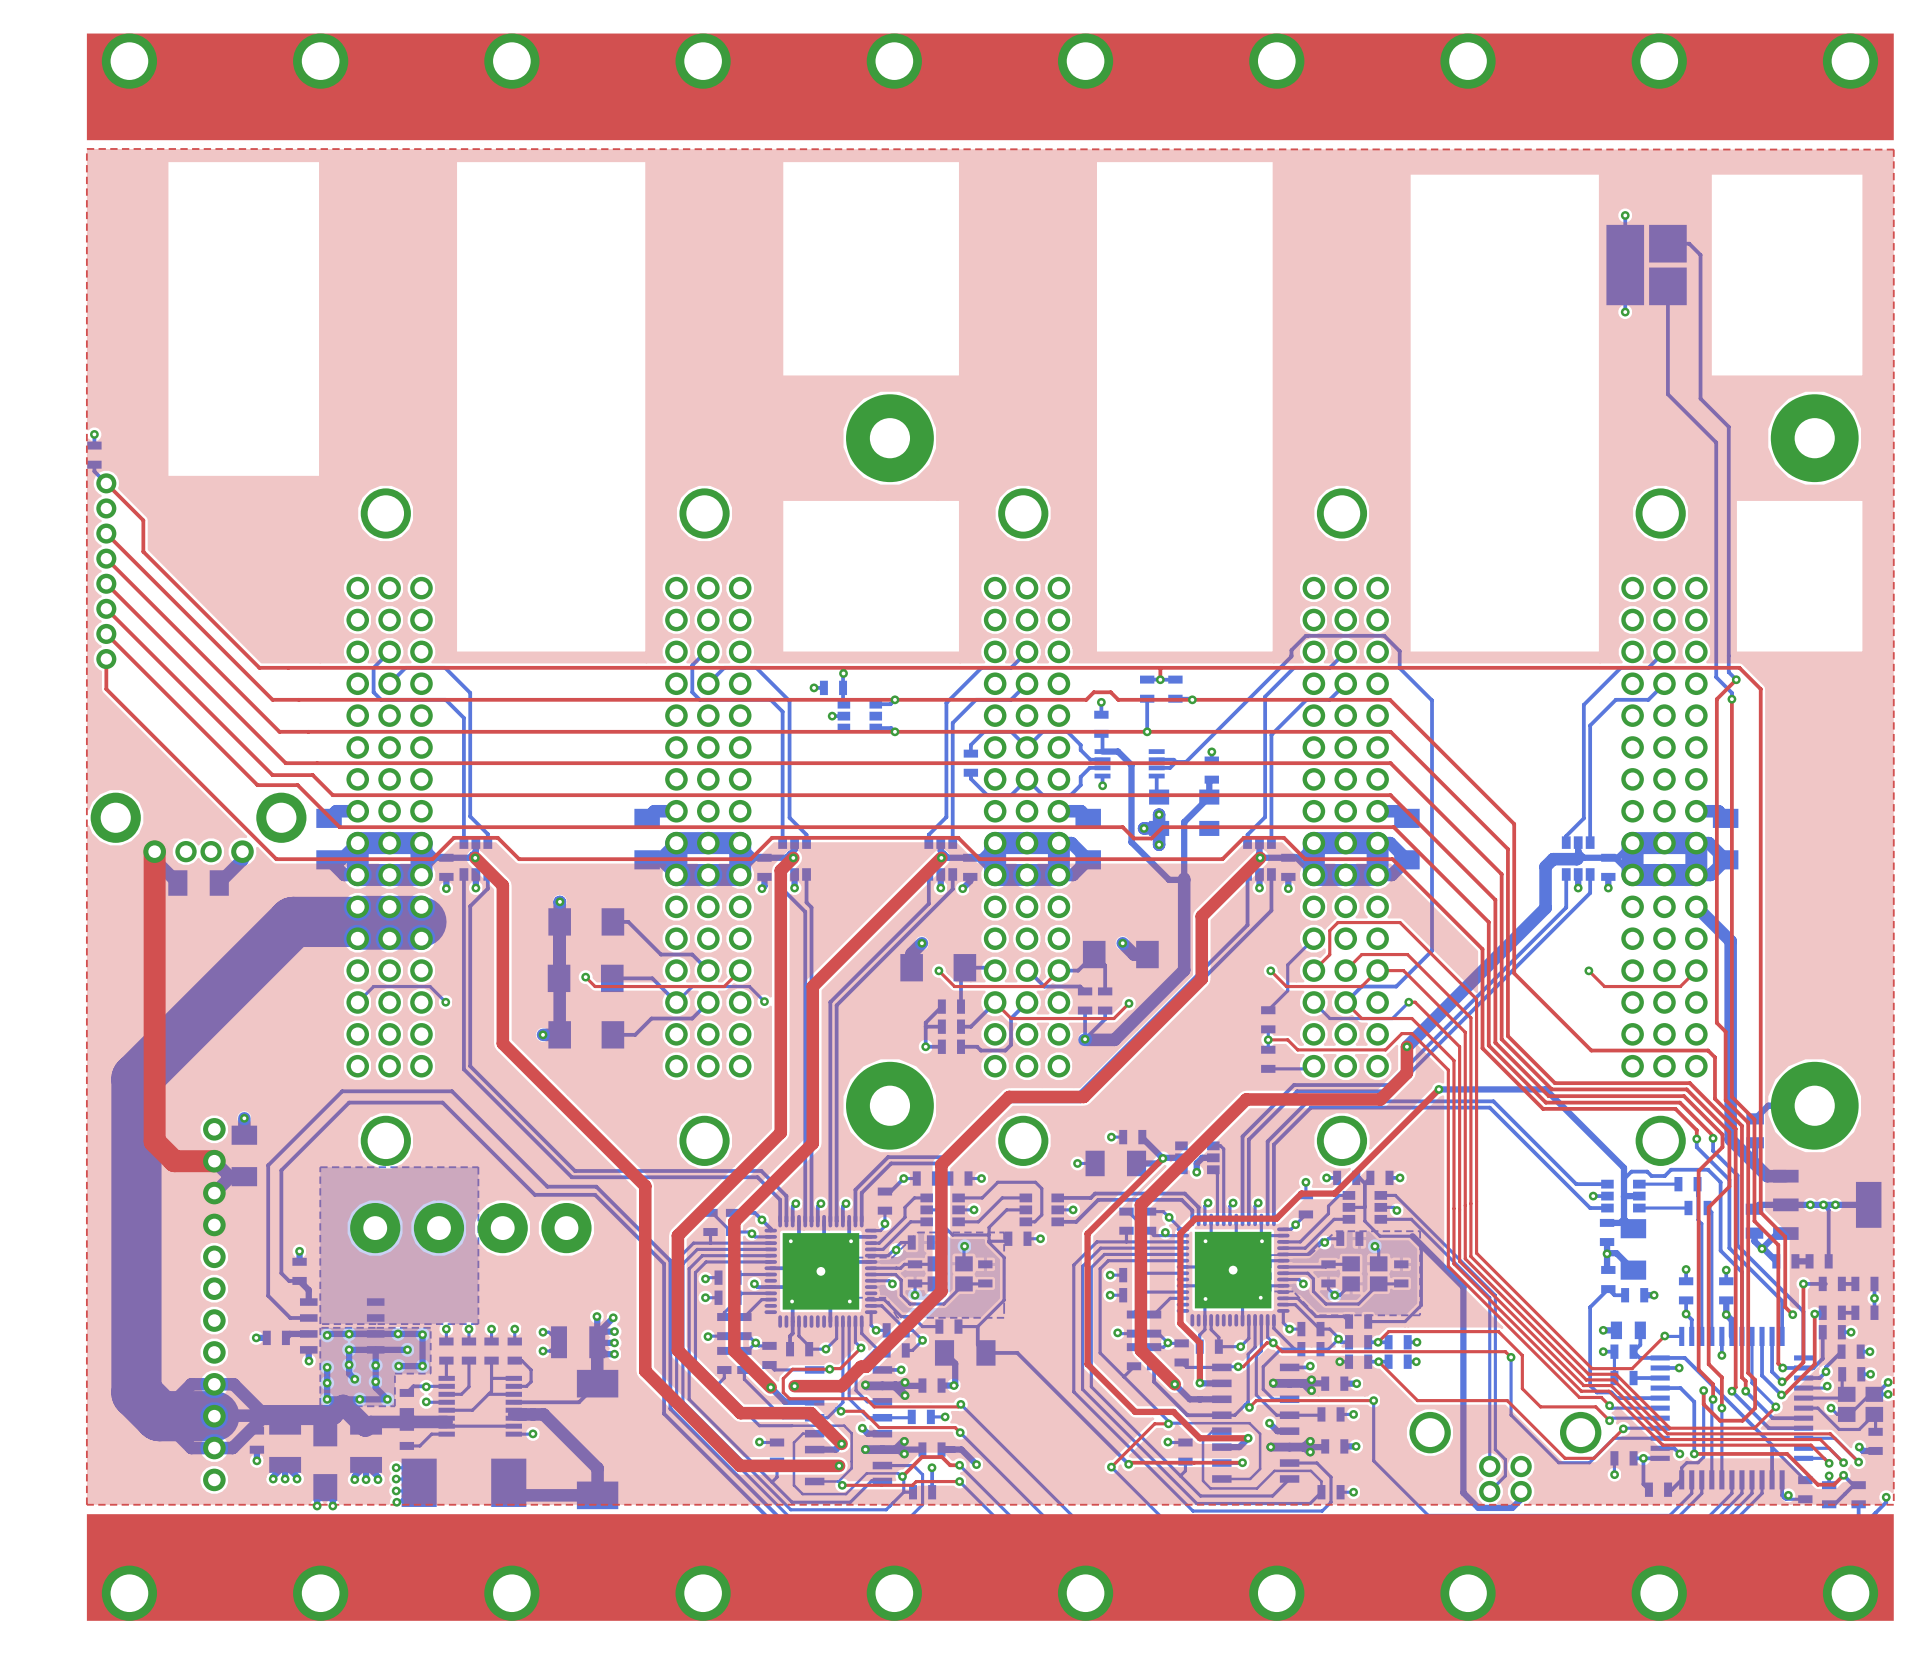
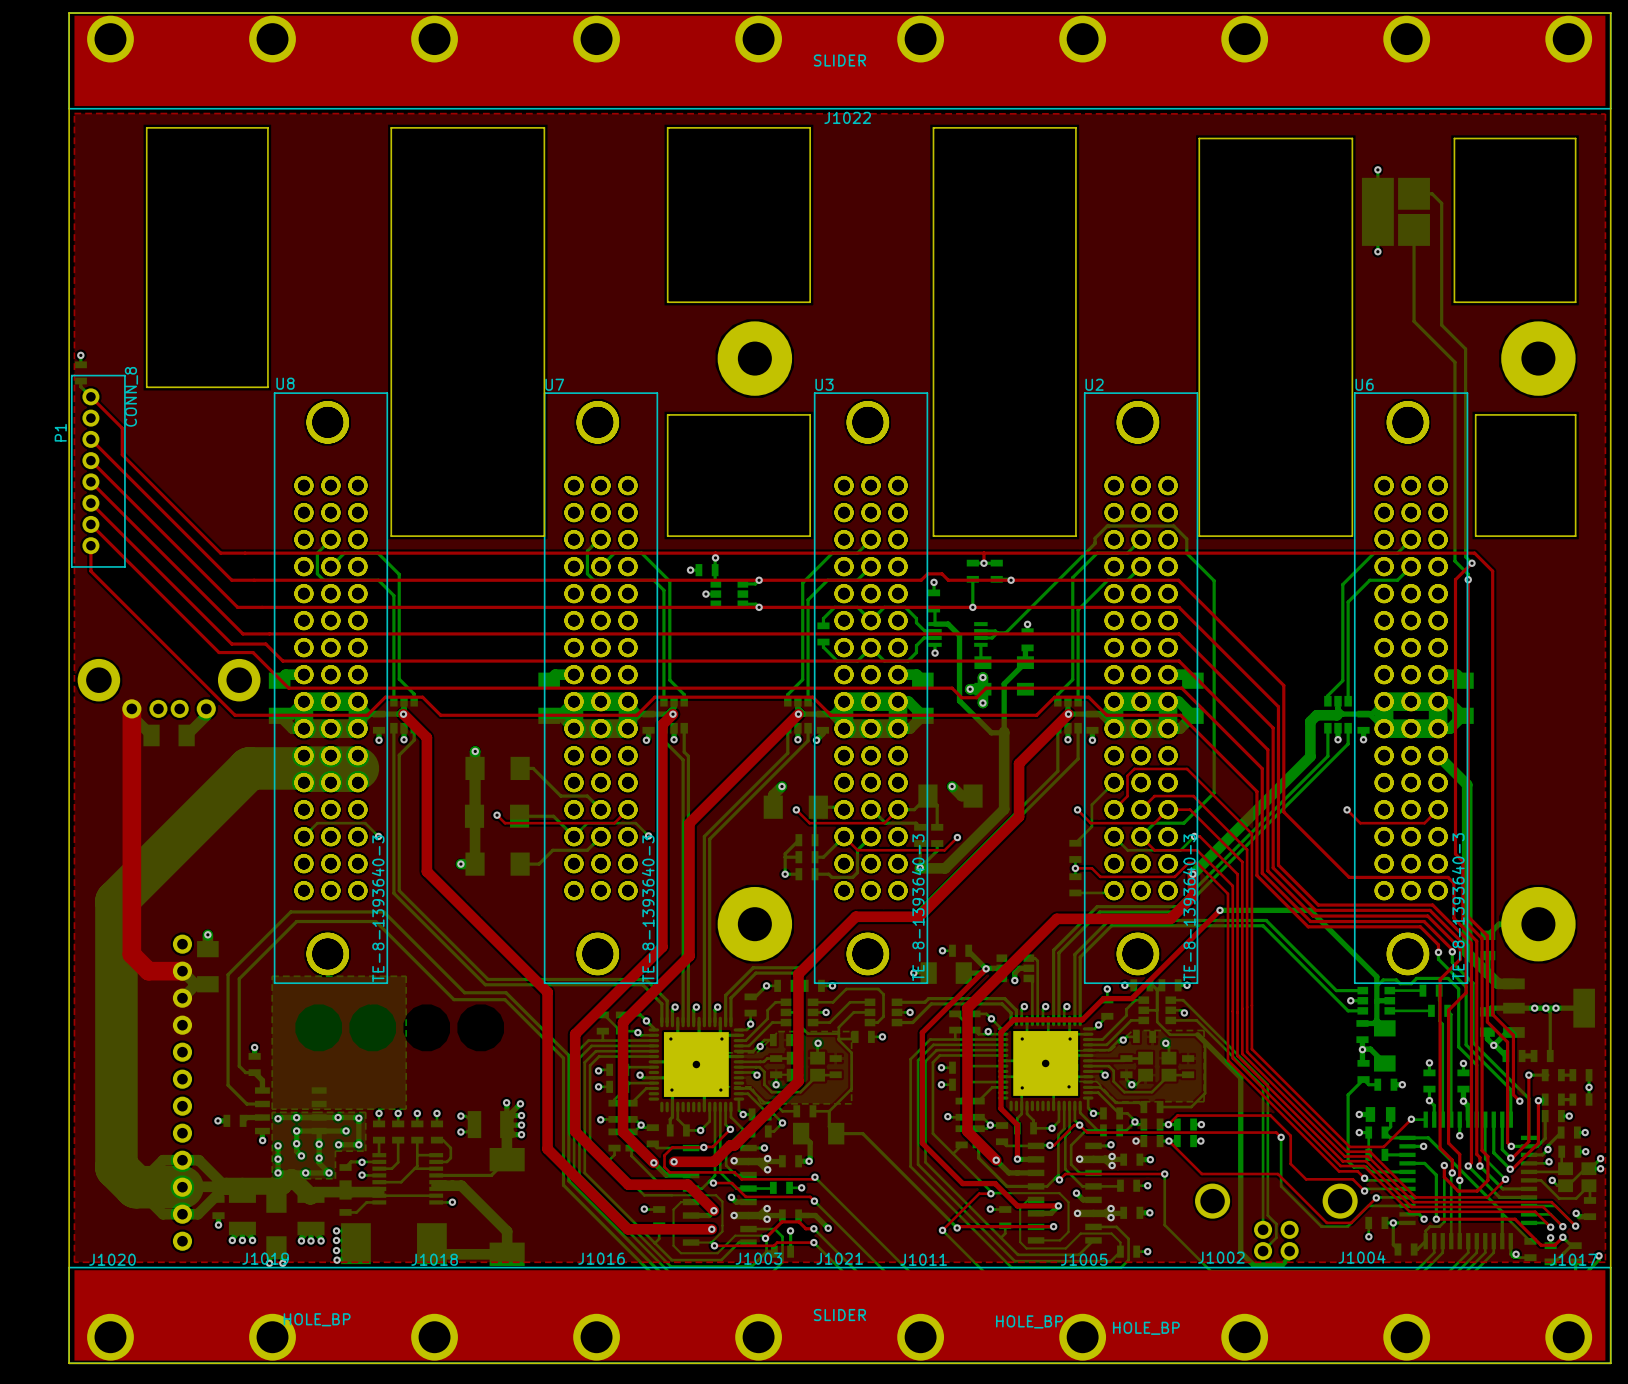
board edge: none -> (69, 13) (69, 1363) (1610, 1363) (1610, 13) (69, 13)
part: (990, 86) -> none
J1022: none -> SLIDER (839, 60)
board edge: none -> (146, 127) (267, 127) (267, 387) (146, 387) (146, 127)
board edge: none -> (391, 127) (544, 127) (544, 536) (391, 536) (391, 127)
board edge: none -> (667, 127) (810, 127) (810, 302) (667, 302) (667, 127)
board edge: none -> (933, 127) (933, 536) (1075, 536) (1075, 127) (933, 127)
board edge: none -> (1199, 138) (1199, 536) (1352, 536) (1352, 138) (1199, 138)
board edge: none -> (1454, 138) (1454, 302) (1575, 302) (1575, 138) (1454, 138)
board edge: none -> (667, 414) (810, 414) (810, 536) (667, 536) (667, 414)
board edge: none -> (1475, 414) (1475, 536) (1575, 536) (1575, 414) (1475, 414)
P1: none -> CONN_8 (98, 471)
U8: none -> TE-8-1393640-3 (330, 688)
U7: none -> TE-8-1393640-3 (600, 688)
U3: none -> TE-8-1393640-3 (871, 688)
U2: none -> TE-8-1393640-3 (1141, 688)
U6: none -> TE-8-1393640-3 (1411, 688)
part: (470, 1228) -> none
J1004 name: none -> J1004 (1361, 1257)
J1002 name: none -> J1002 (1221, 1257)
J1019 name: none -> J1019 (265, 1258)
J1016 name: none -> J1016 (601, 1258)
J1003 name: none -> J1003 (758, 1258)
J1020 name: none -> J1020 (112, 1259)
J1018 name: none -> J1018 (434, 1259)
J1011 name: none -> J1011 (923, 1259)
J1005 name: none -> J1005 (1084, 1259)
J1017 name: none -> J1017 (1573, 1259)
part: (990, 1567) -> none
J1021: none -> SLIDER (839, 1315)
J1019 value: none -> HOLE_BP (317, 1319)
J1005 value: none -> HOLE_BP (1029, 1321)
J1002 value: none -> HOLE_BP (1146, 1328)

